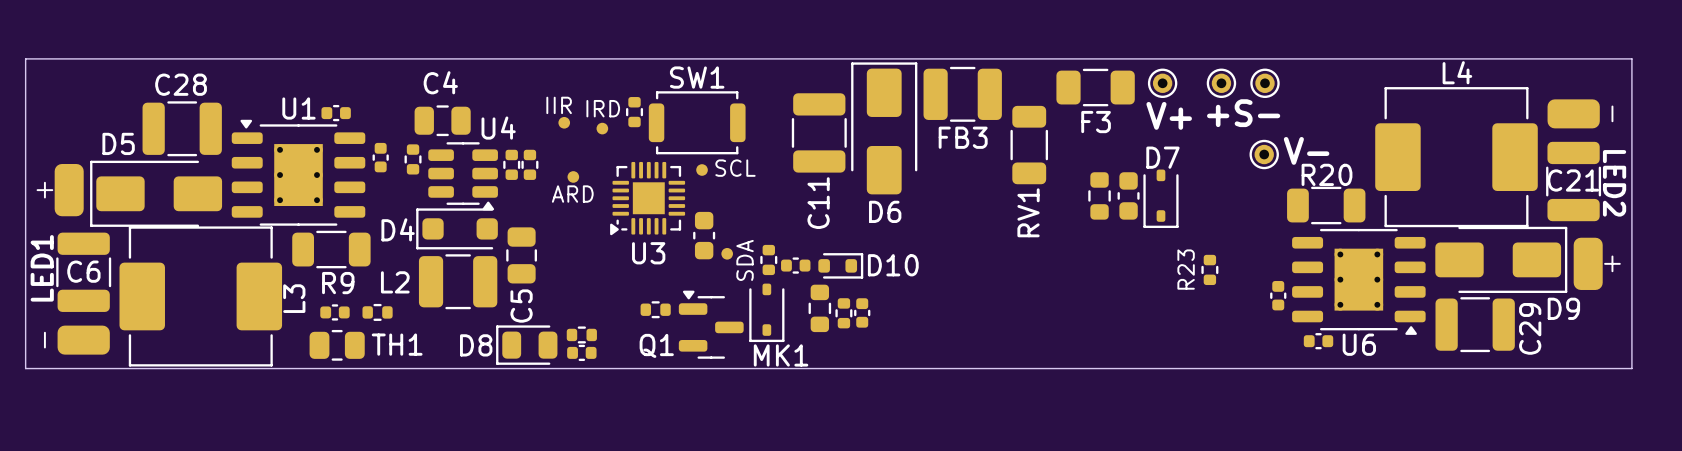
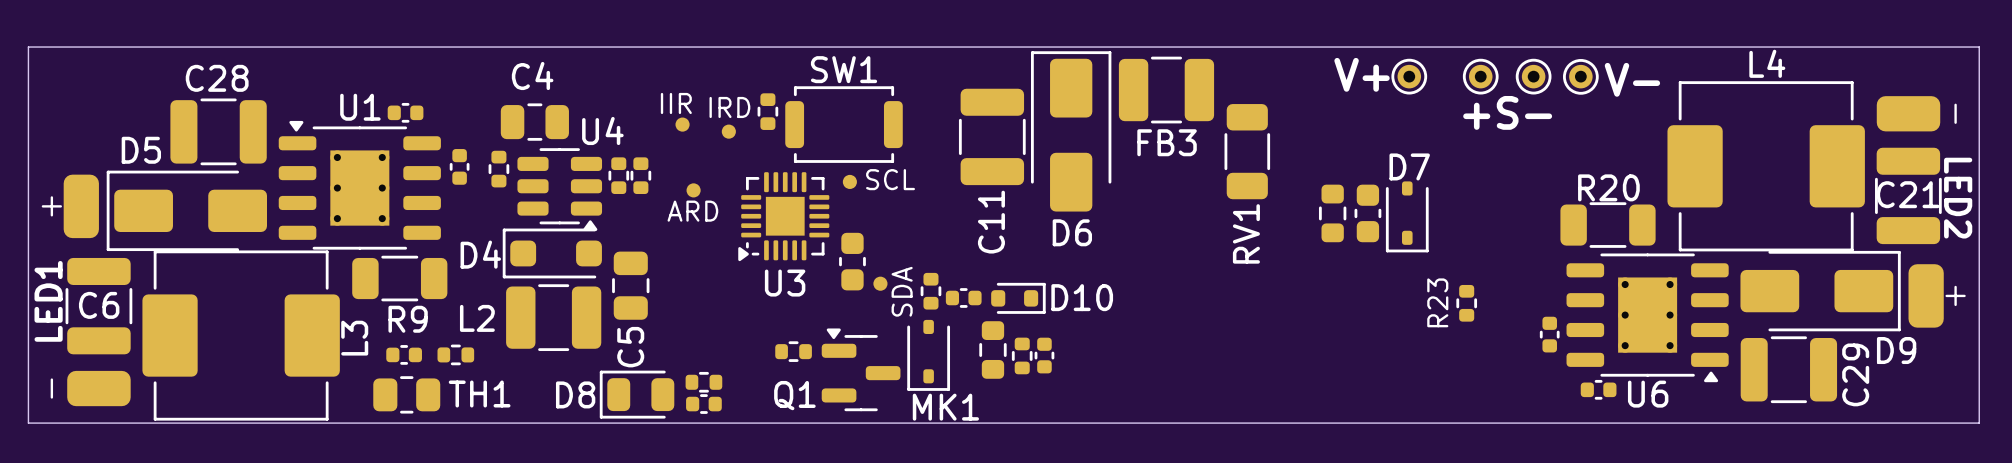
F3: (1095, 87) -> none
text position: V+ (1169, 115) -> V+ (1362, 74)
text position: V- (1306, 150) -> V- (1632, 79)
part position: (1264, 154) -> (1580, 76)

